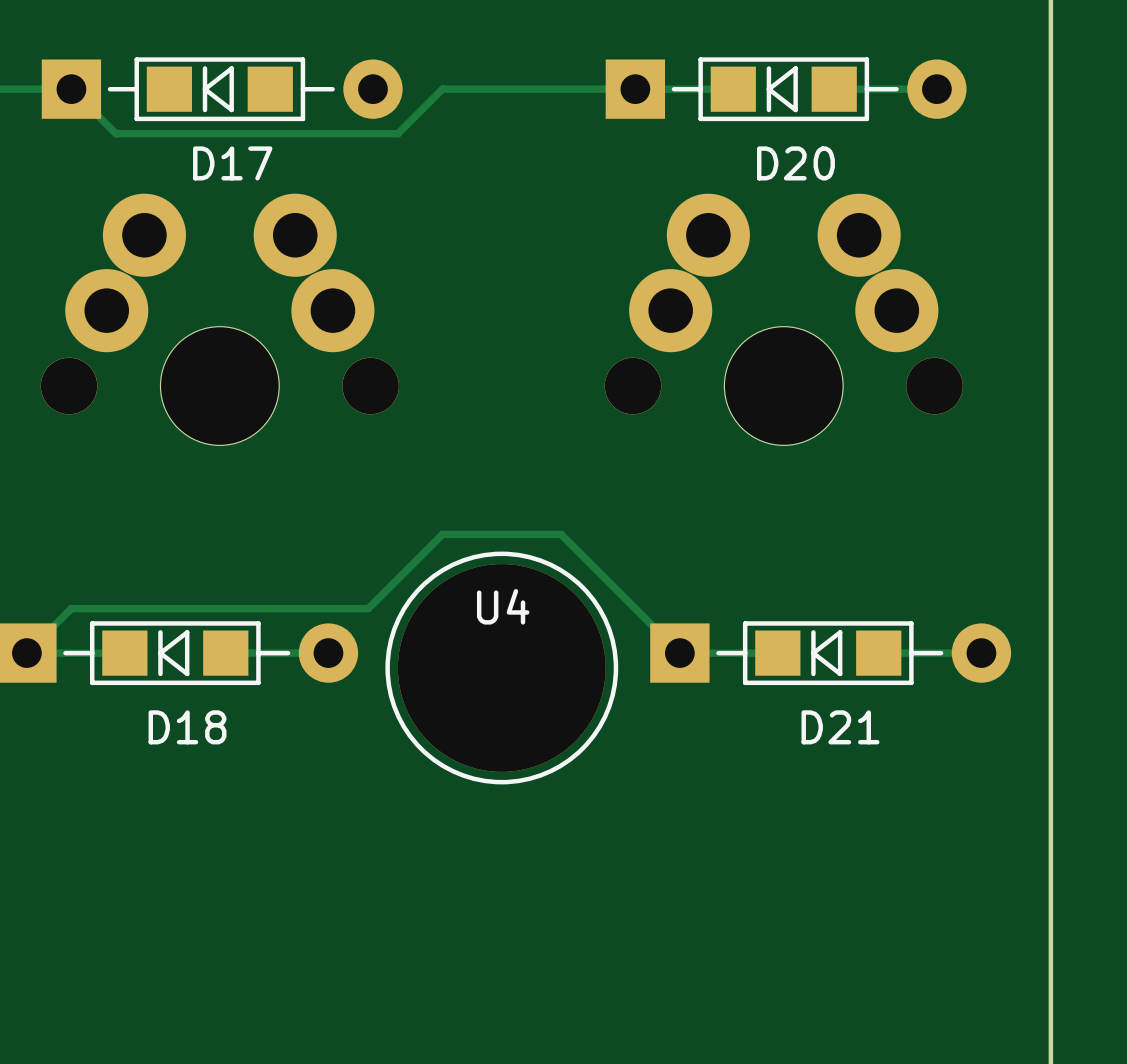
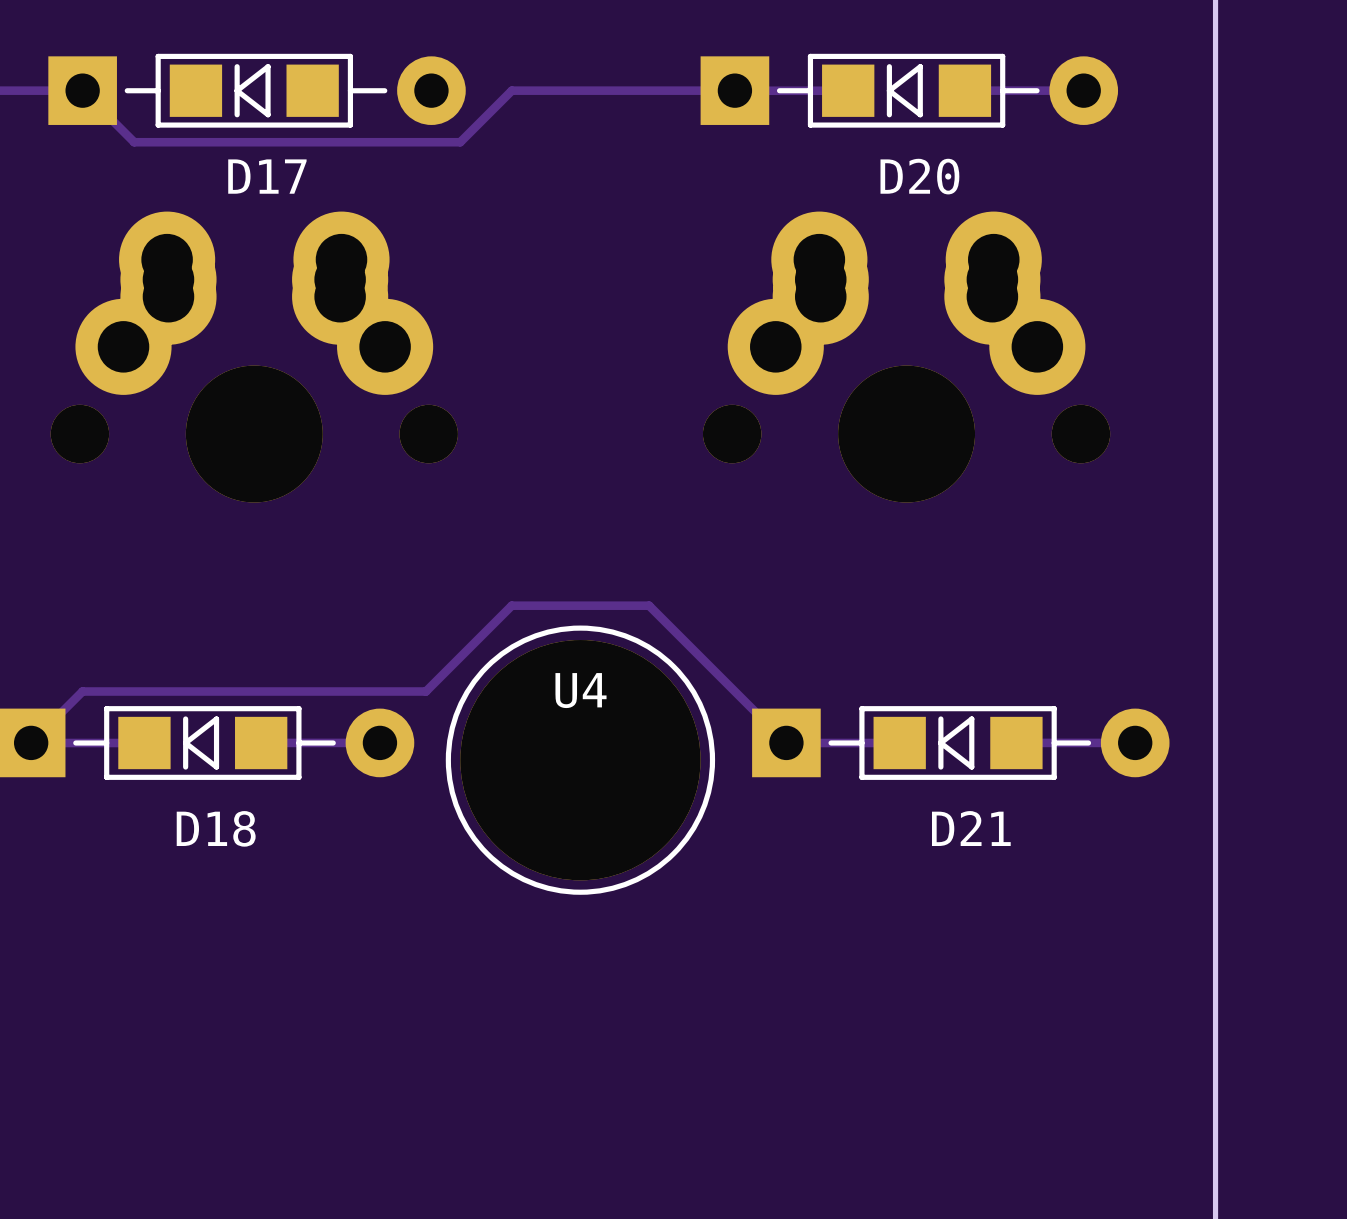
part footprint: [40, 193, 399, 446] -> [50, 211, 458, 503]
part footprint: [604, 193, 963, 446] -> [702, 211, 1111, 503]

